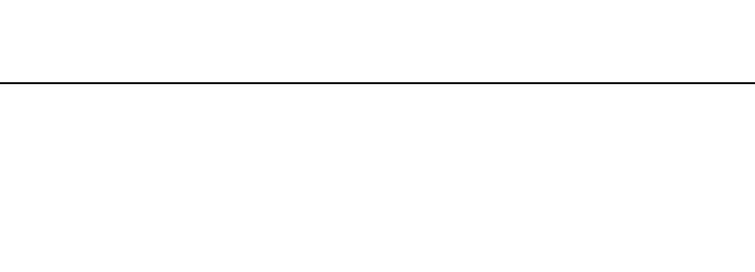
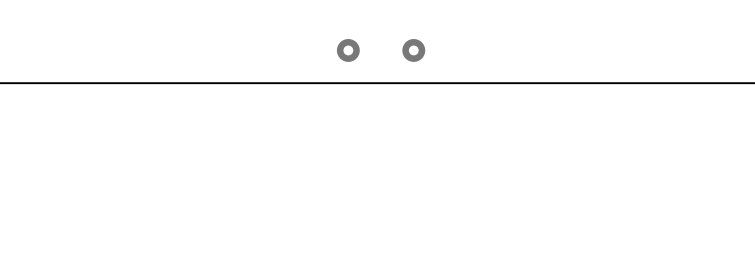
via: none -> (348, 50)
via: none -> (413, 50)

